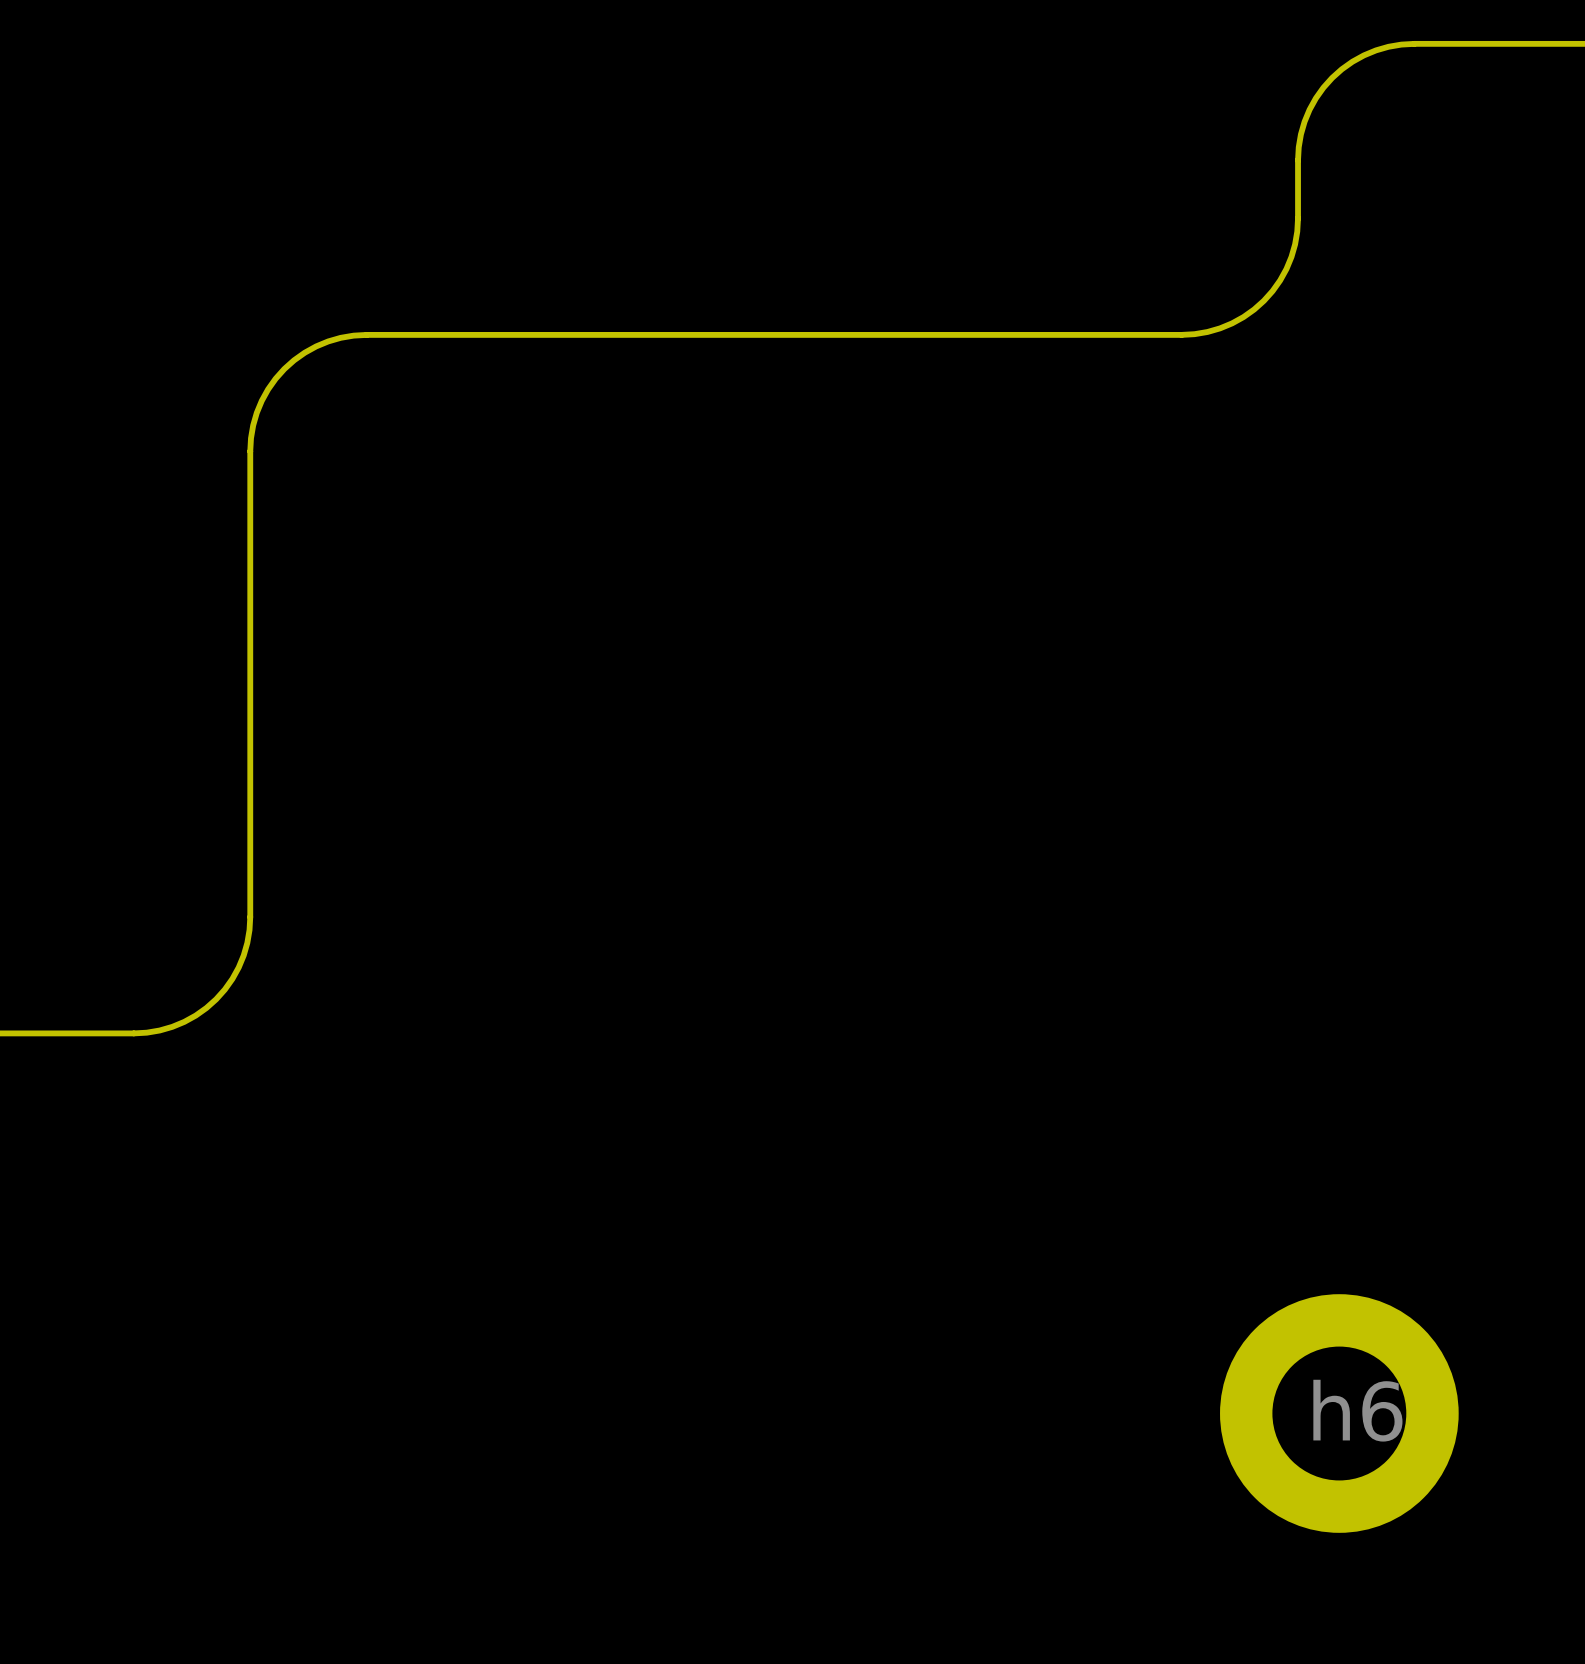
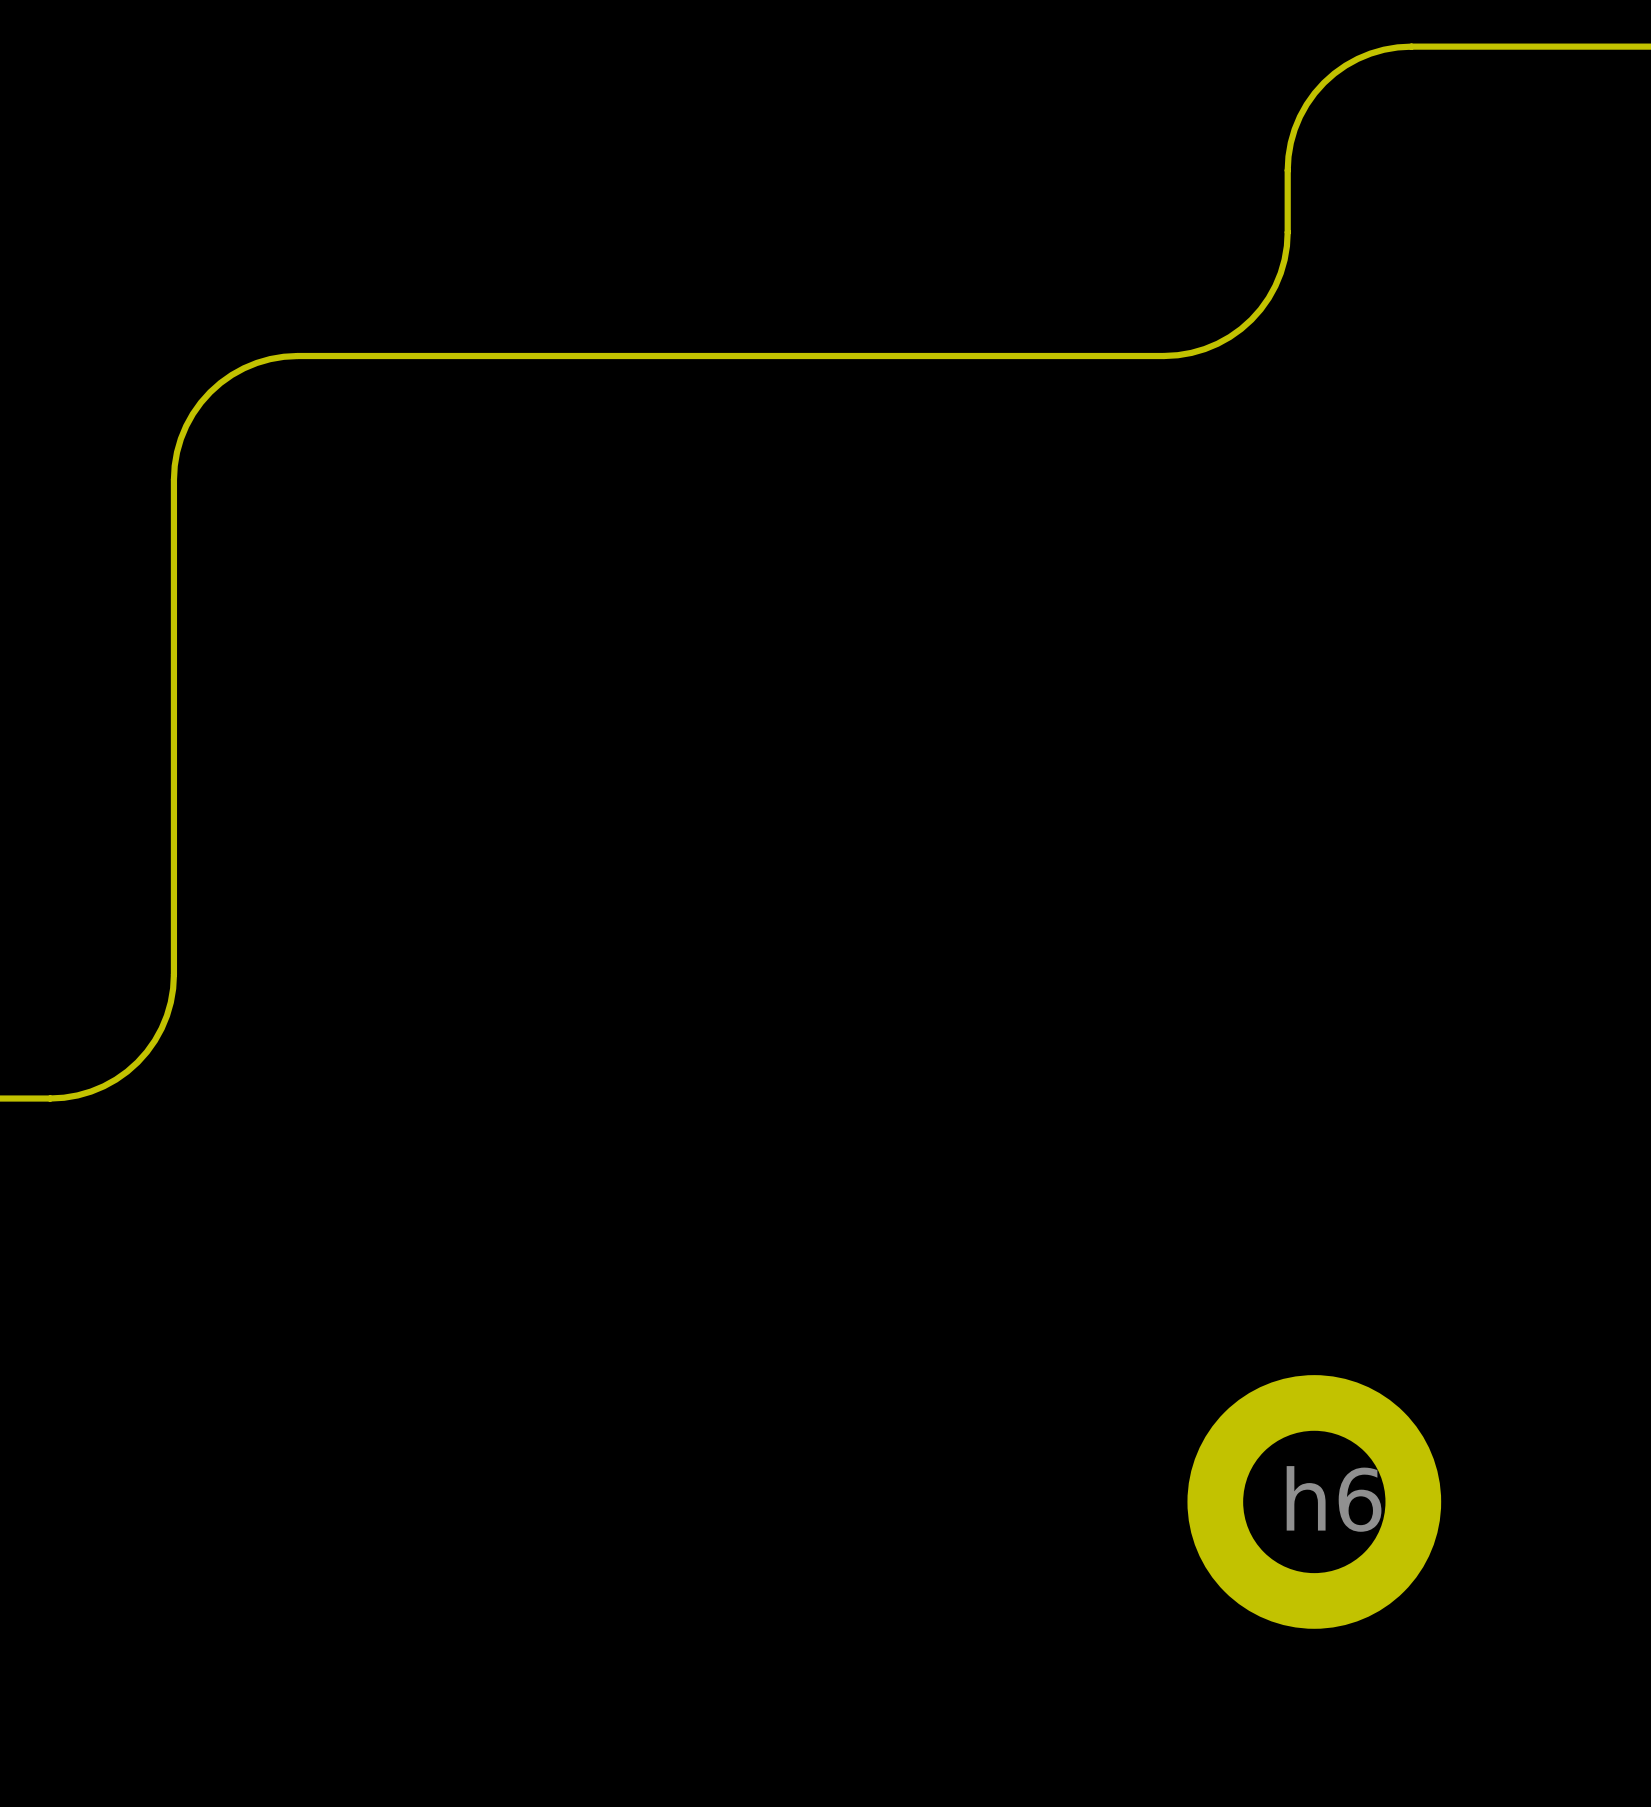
h6 position: (1339, 1413) -> (1314, 1501)

